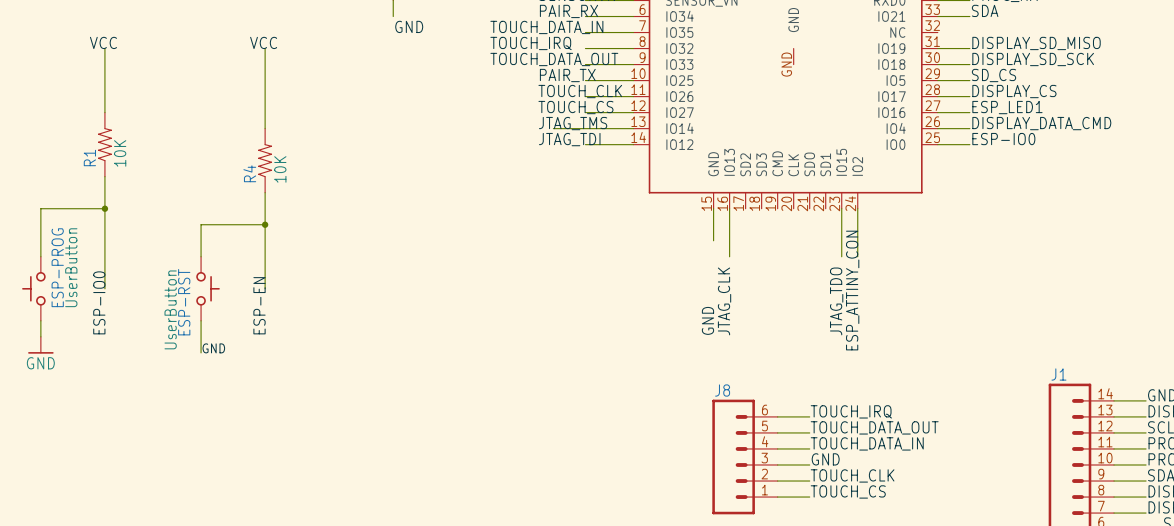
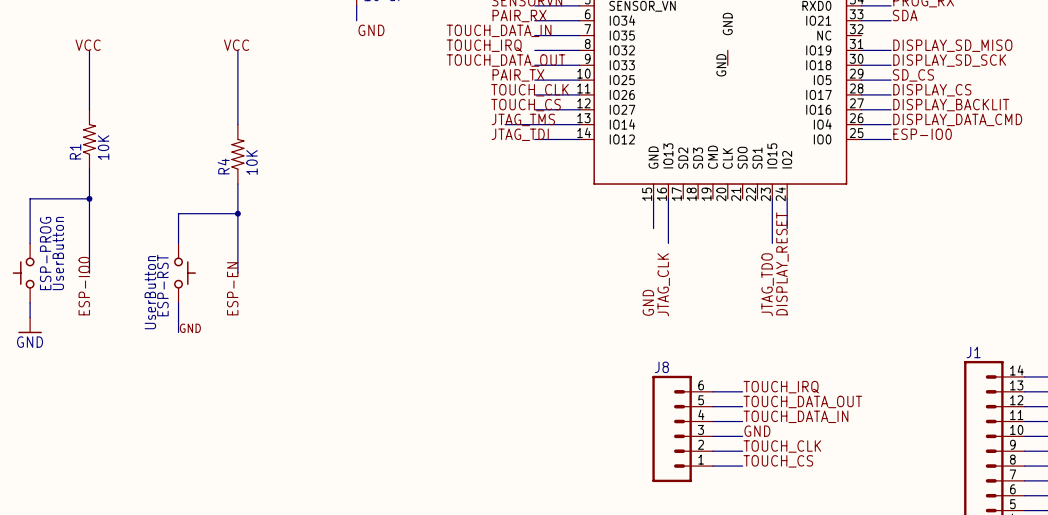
label: ESP_LED1 (1007, 107) -> DISPLAY_BACKLIT (951, 105)
label: none -> DISPLAY_RESET (782, 263)
label: ESP_ATTINY_CON (852, 290) -> none

